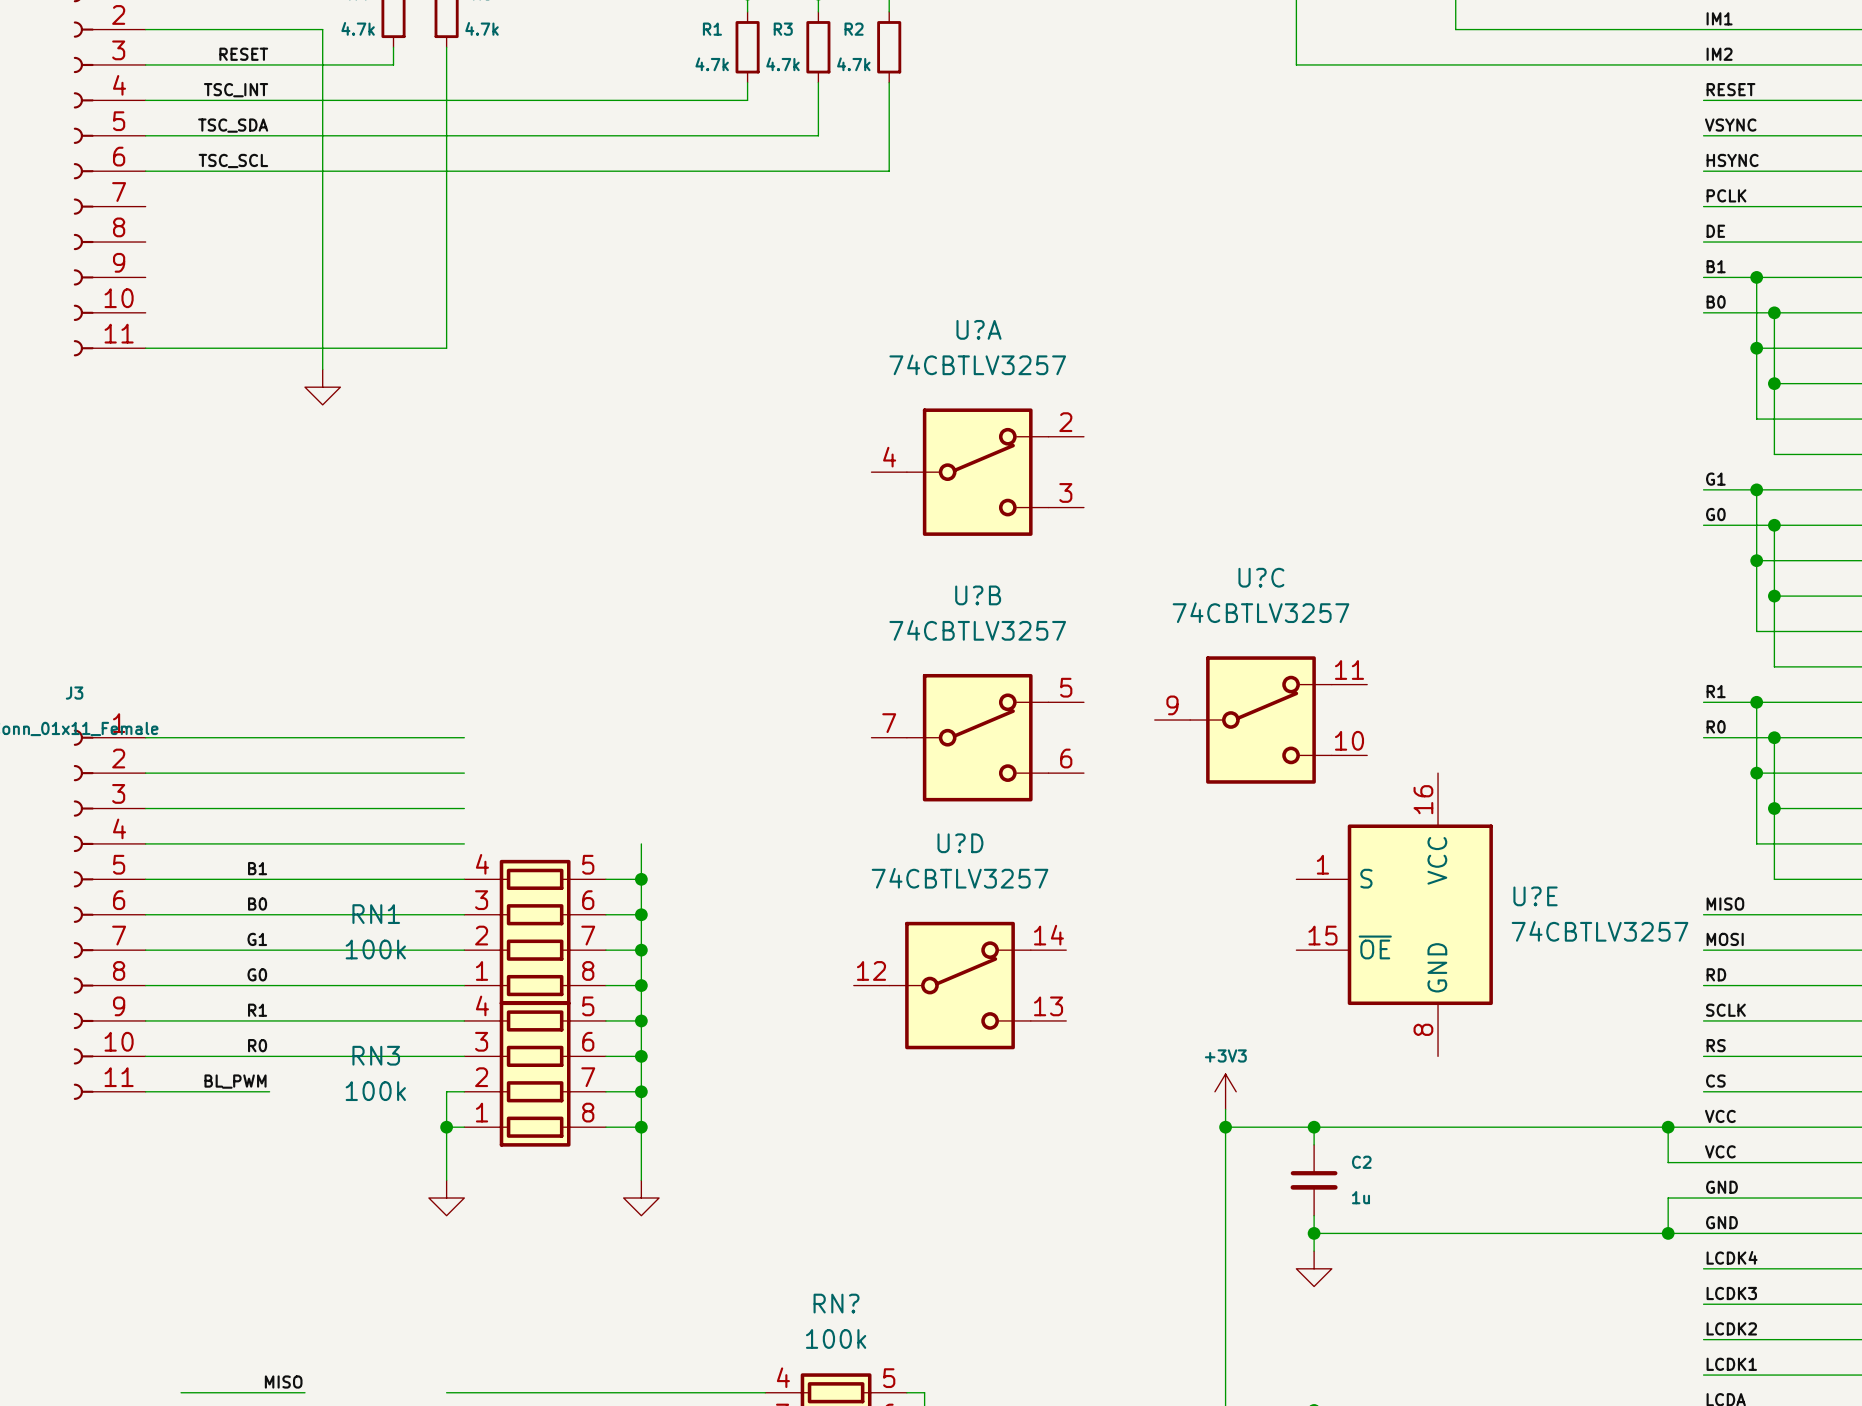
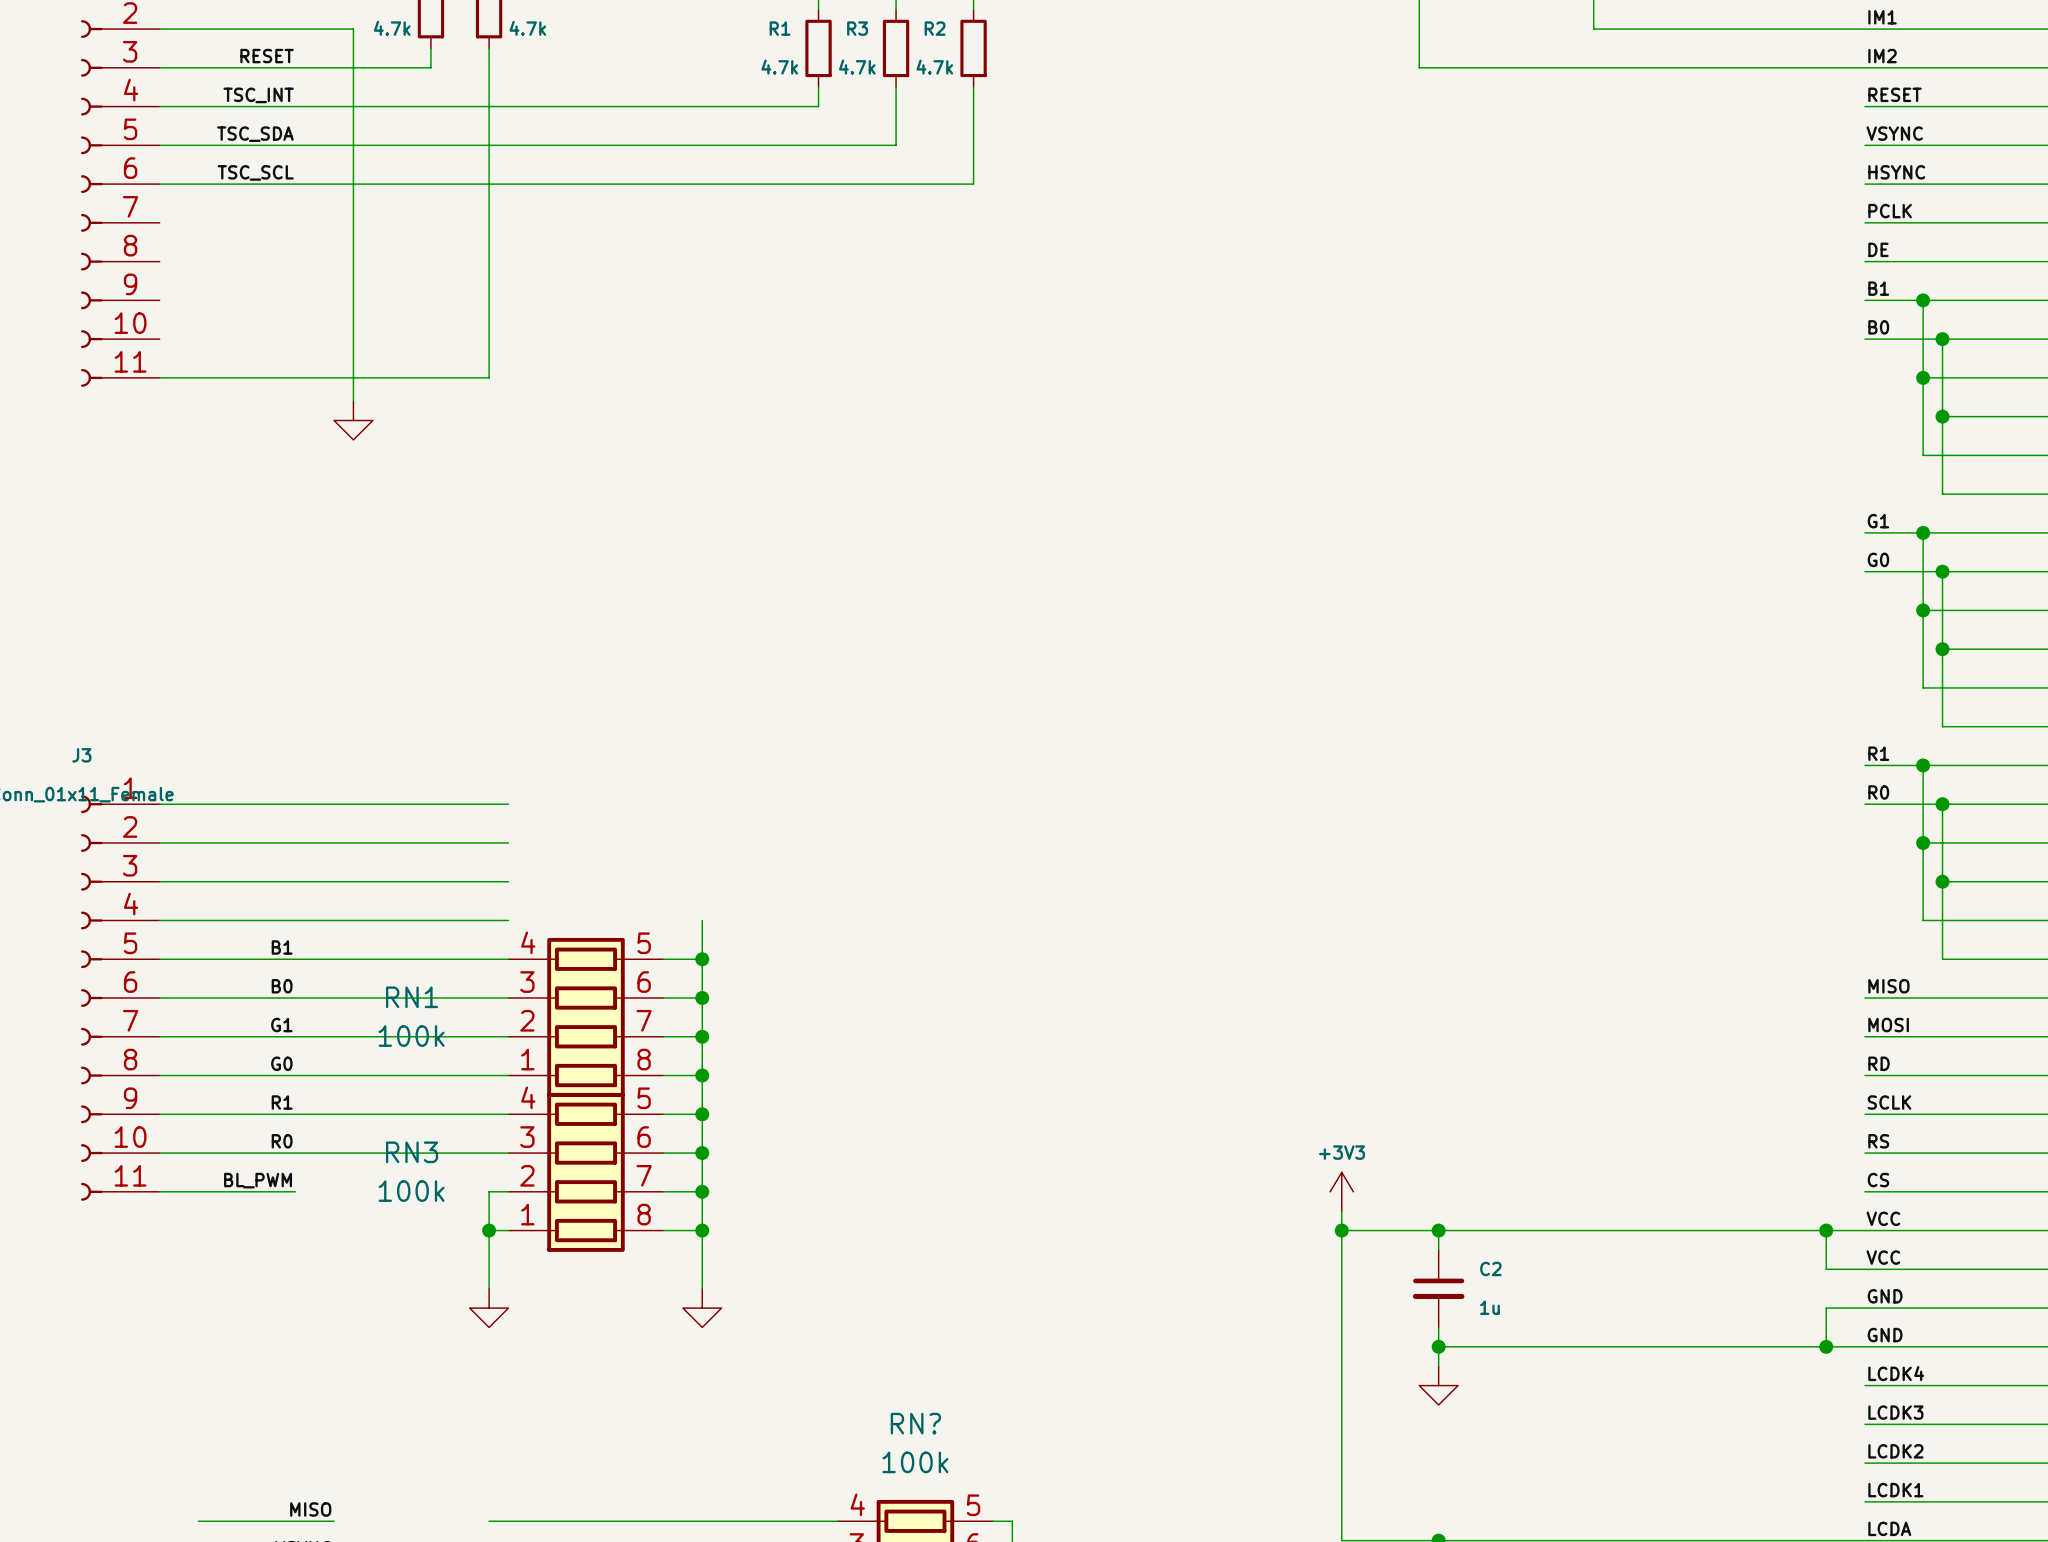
U?A: 74CBTLV3257 (977, 472) -> none
U?C: 74CBTLV3257 (1260, 720) -> none
U?B: 74CBTLV3257 (977, 737) -> none
U?E: 74CBTLV3257 (1394, 914) -> none
U?D: 74CBTLV3257 (960, 985) -> none

